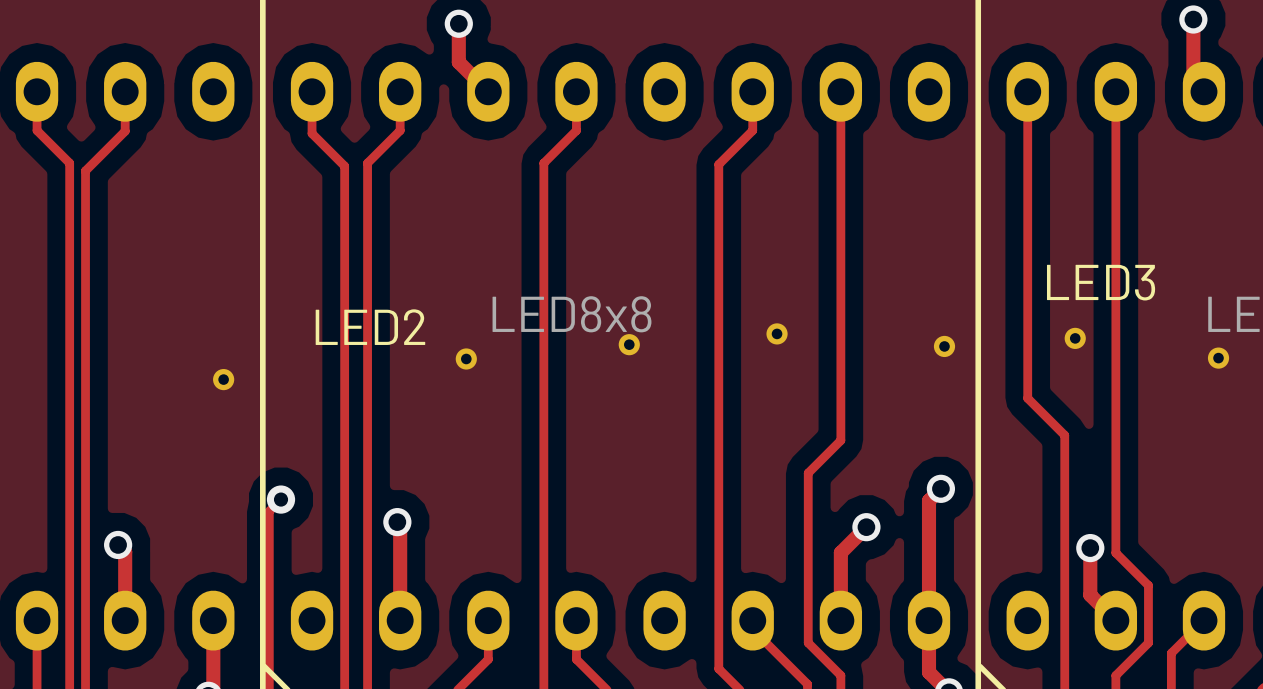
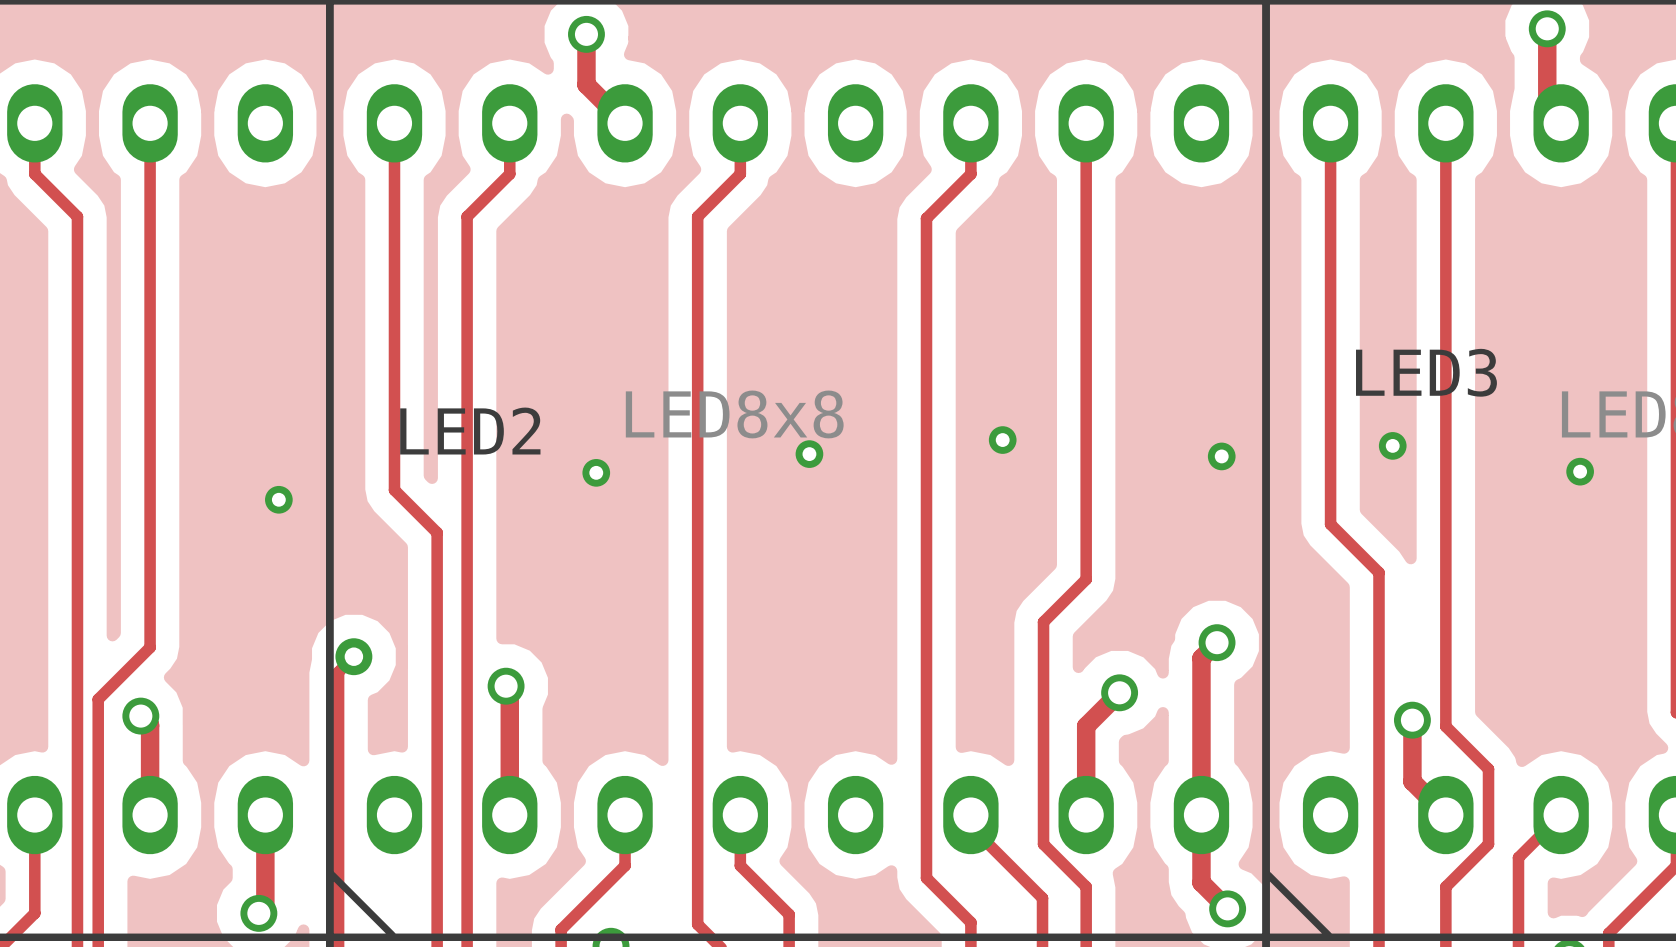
track: (125, 131) (85, 170) (85, 532) -> (150, 174) (150, 647) (98, 699)
track: (312, 133) (344, 166) (344, 404) -> (394, 177) (394, 490) (437, 532)

